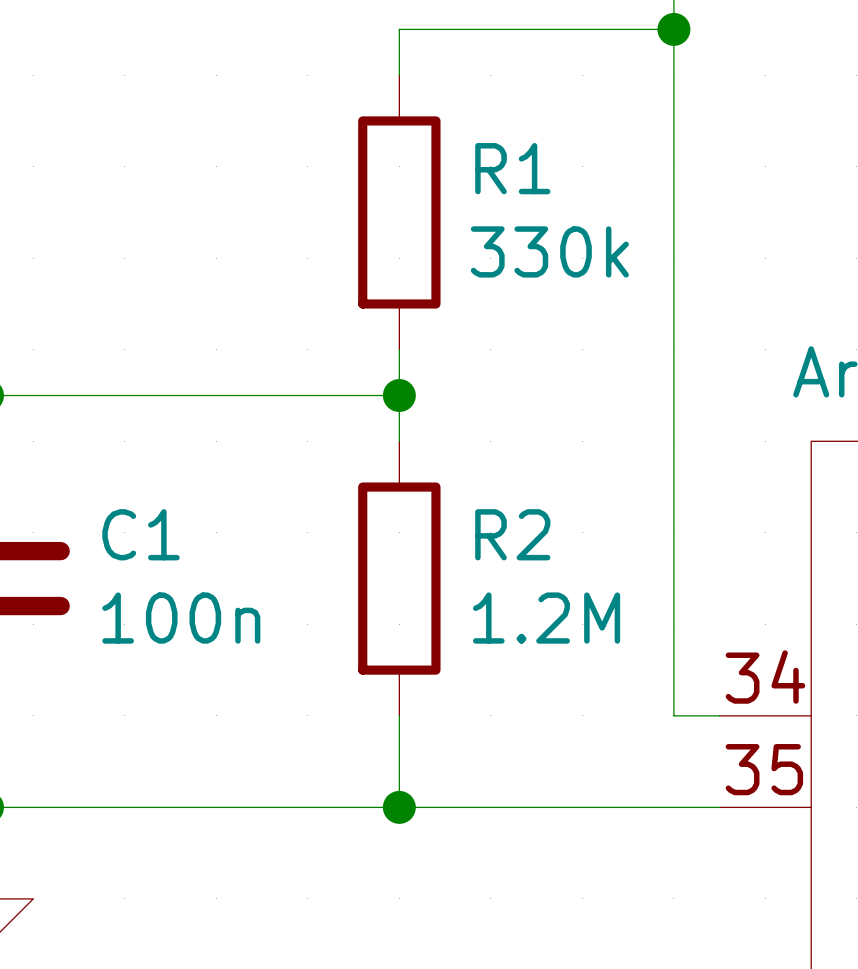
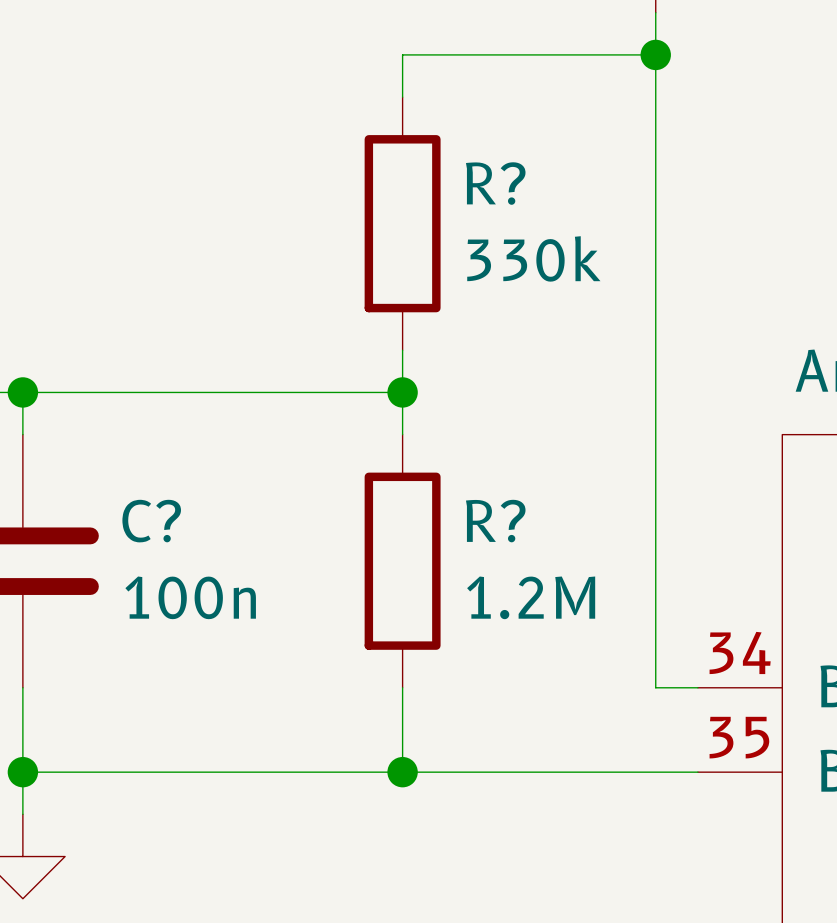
R1 name: R1 (512, 168) -> R? (495, 183)
C1 name: C1 (141, 534) -> C? (151, 521)
R2 name: R2 (512, 534) -> R? (495, 521)

